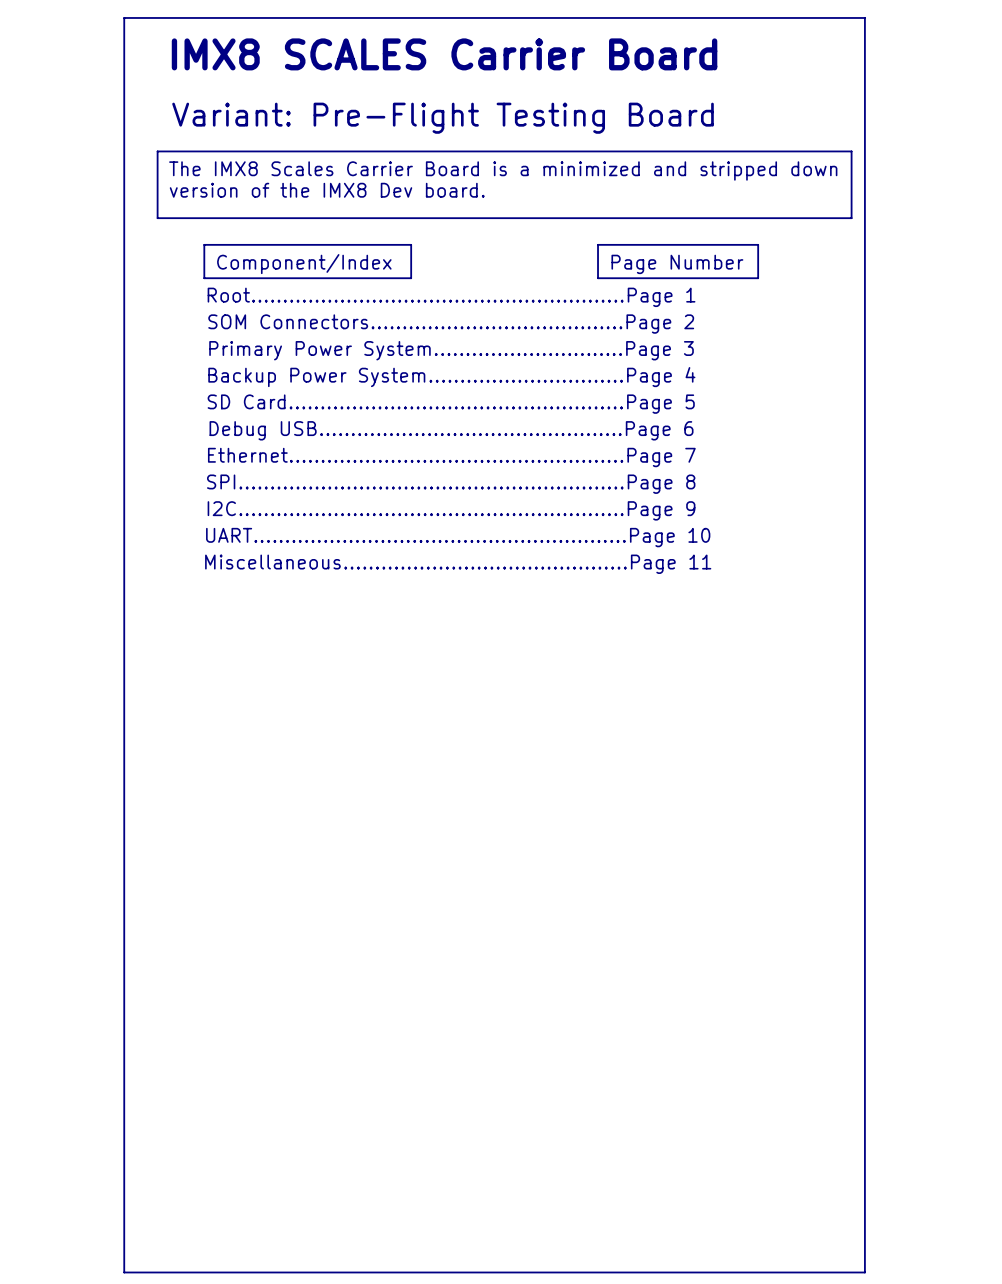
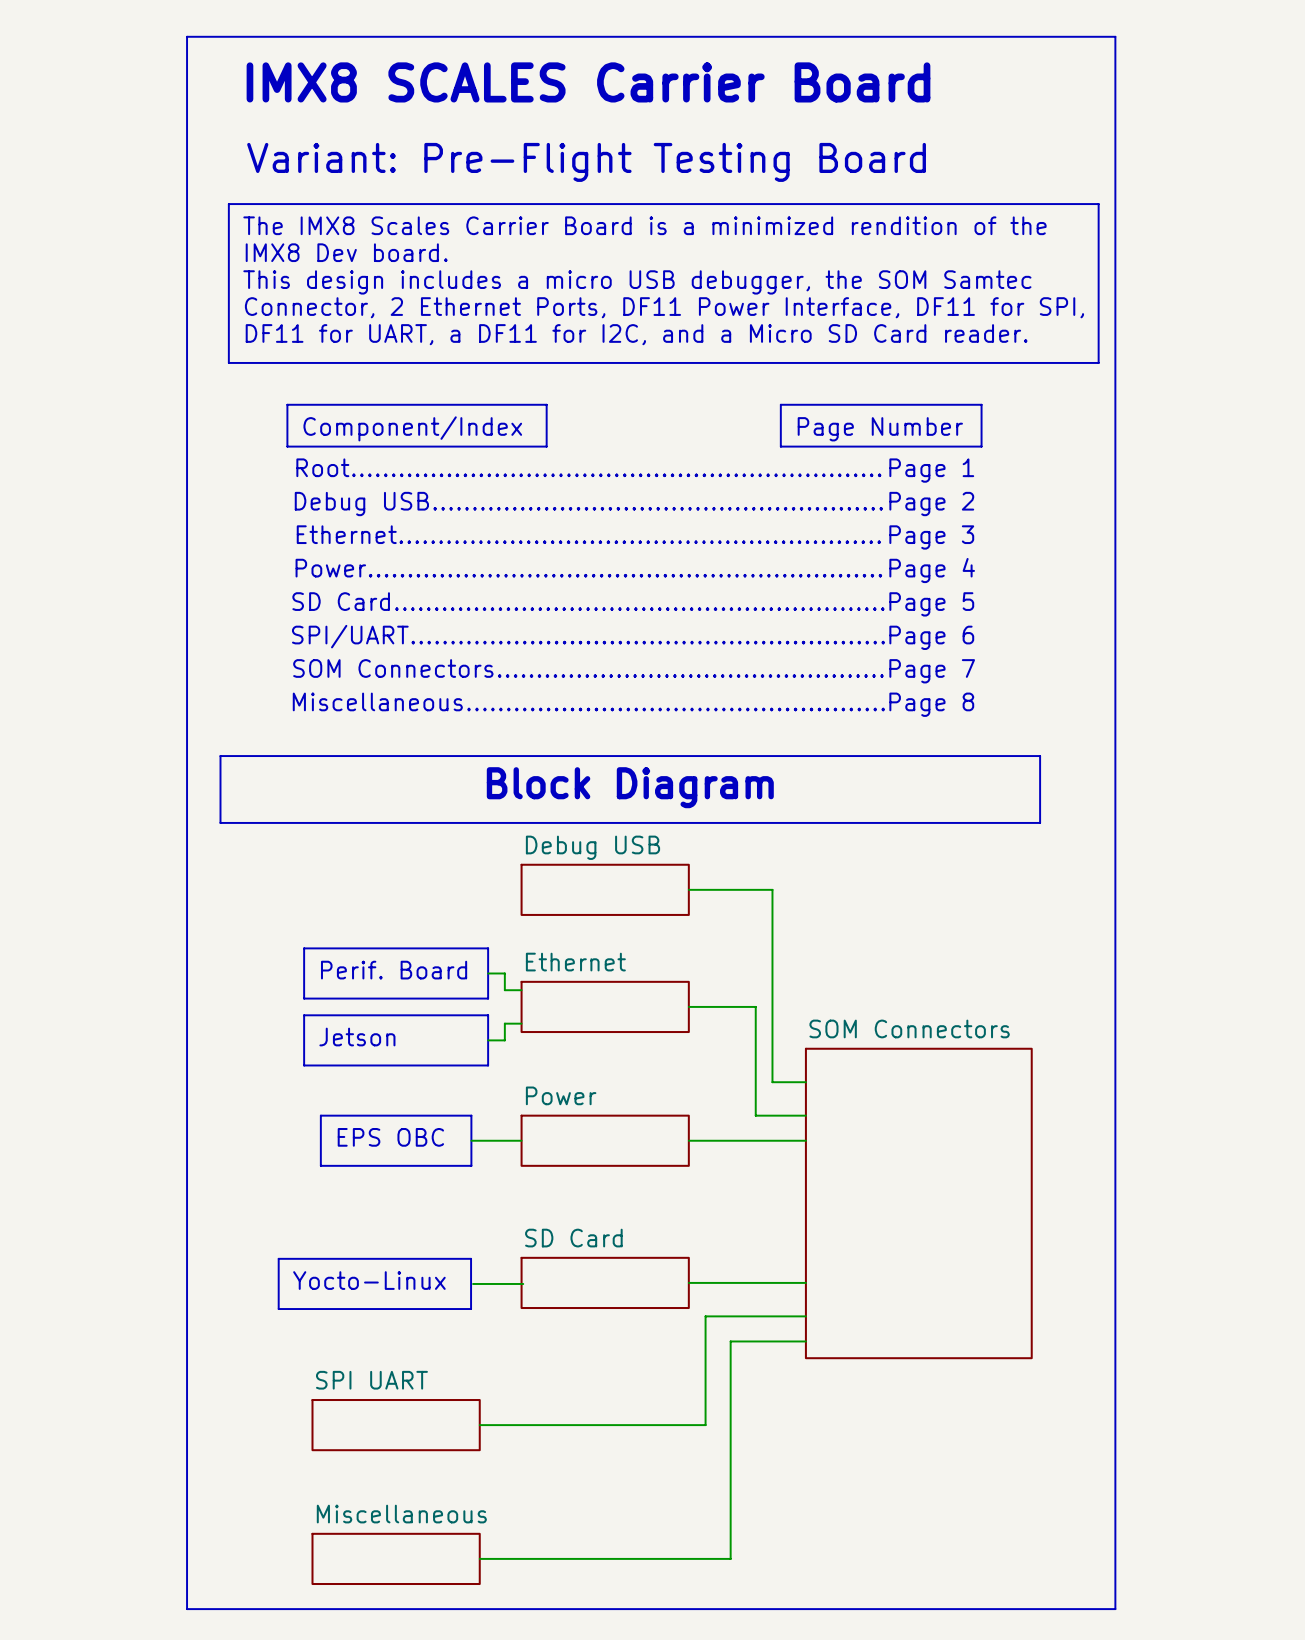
text: The IMX8 Scales Carrier Board is a minimized and stripped down (503, 170) -> The IMX8 Scales Carrier Board is a minimized rendition of the (644, 225)
text: version of the IMX8 Dev board. (327, 190) -> IMX8 Dev board. (346, 252)
text: none -> This design includes a micro USB debugger, the SOM Samtec (637, 282)
line: (157, 218) (851, 218) -> none
text: none -> Connector, 2 Ethernet Ports, DF11 Power Interface, DF11 for SPI, (664, 307)
text: none -> DF11 for UART, a DF11 for I2C, and a Micro SD Card reader. (636, 334)
text position: Component/Index (304, 264) -> Component/Index (412, 428)
text position: Page Number (677, 264) -> Page Number (880, 429)
line: (204, 278) (204, 244) (411, 244) (411, 278) -> (287, 362) (228, 362) (228, 287)
line: none -> (546, 362) (780, 362)
line: (598, 278) (598, 244) (758, 244) (758, 278) -> (1098, 287) (1098, 362) (981, 362)
text: Root...........................................................Page 1 (451, 297) -> none
line: none -> (287, 404) (546, 404) (546, 446) (287, 446) (287, 404)
line: none -> (780, 404) (981, 404) (981, 446) (780, 446) (780, 404)
text: SOM Connectors........................................Page 2 (451, 324) -> none
text: Primary Power System..............................Page 3 (451, 350) -> none
text: none -> Root................................................................... (588, 467)
text: none -> Page 1 (931, 470)
text: Backup Power System...............................Page 4 (451, 377) -> none
text: none -> Debug USB......................................................... (588, 504)
text: none -> Page 2 (931, 504)
text: SD Card.....................................................Page 5 (451, 404) -> none
text: none -> Ethernet............................................................. (588, 534)
text: none -> Page 3 (931, 537)
text: Debug USB................................................Page 6 (451, 430) -> none
text: none -> Power................................................................. (588, 568)
text: none -> Page 4 (932, 570)
text: Ethernet.....................................................Page 7 (451, 457) -> none
text: none -> SD Card.............................................................. (588, 601)
text: none -> Page 5 (931, 604)
text: SPI.............................................................Page 8 (451, 484) -> none
text: none -> SPI/UART............................................................ (588, 636)
text: none -> Page 6 (931, 637)
text: I2C.............................................................Page 9 (451, 510) -> none
text: none -> SOM Connectors................................................. (588, 668)
text: none -> Page 7 (932, 671)
text: UART...........................................................Page 10 (458, 537) -> none
text: none -> Miscellaneous..................................................... (588, 701)
text: none -> Page 8 (931, 704)
text: Miscellaneous.............................................Page 11 (458, 564) -> none
line: none -> (220, 756) (1040, 756) (1040, 822) (220, 822) (220, 756)
text: none -> Block Diagram (630, 787)
sheet Debug USB: none -> (605, 889)
wire: none -> (688, 889) (772, 889) (772, 1082) (805, 1082)
line: none -> (304, 948) (304, 998) (488, 998) (488, 948) (304, 948)
text: none -> Perif. Board (394, 970)
wire: none -> (488, 973) (504, 973) (504, 990) (521, 990)
sheet Ethernet: none -> (605, 1006)
wire: none -> (688, 1006) (755, 1006) (755, 1115) (805, 1115)
line: none -> (304, 1015) (488, 1015) (488, 1065) (304, 1065) (304, 1015)
wire: none -> (521, 1023) (504, 1023) (504, 1040) (488, 1040)
text: none -> Jetson (357, 1037)
line: none -> (320, 1115) (471, 1115) (471, 1165) (320, 1165) (320, 1115)
text: none -> EPS OBC (390, 1137)
wire: none -> (471, 1140) (521, 1140)
sheet Power: none -> (605, 1140)
wire: none -> (688, 1140) (805, 1140)
sheet SOM Connectors: none -> (918, 1203)
line: none -> (278, 1258) (471, 1258) (471, 1309) (278, 1309) (278, 1258)
text: none -> Yocto-Linux (369, 1280)
sheet SD Card: none -> (605, 1282)
wire: none -> (688, 1282) (805, 1282)
wire: none -> (473, 1283) (523, 1283)
wire: none -> (805, 1316) (705, 1316) (705, 1425) (479, 1425)
wire: none -> (805, 1341) (730, 1341) (730, 1558) (479, 1558)
sheet SPI UART: none -> (396, 1425)
sheet Miscellaneous: none -> (396, 1558)

